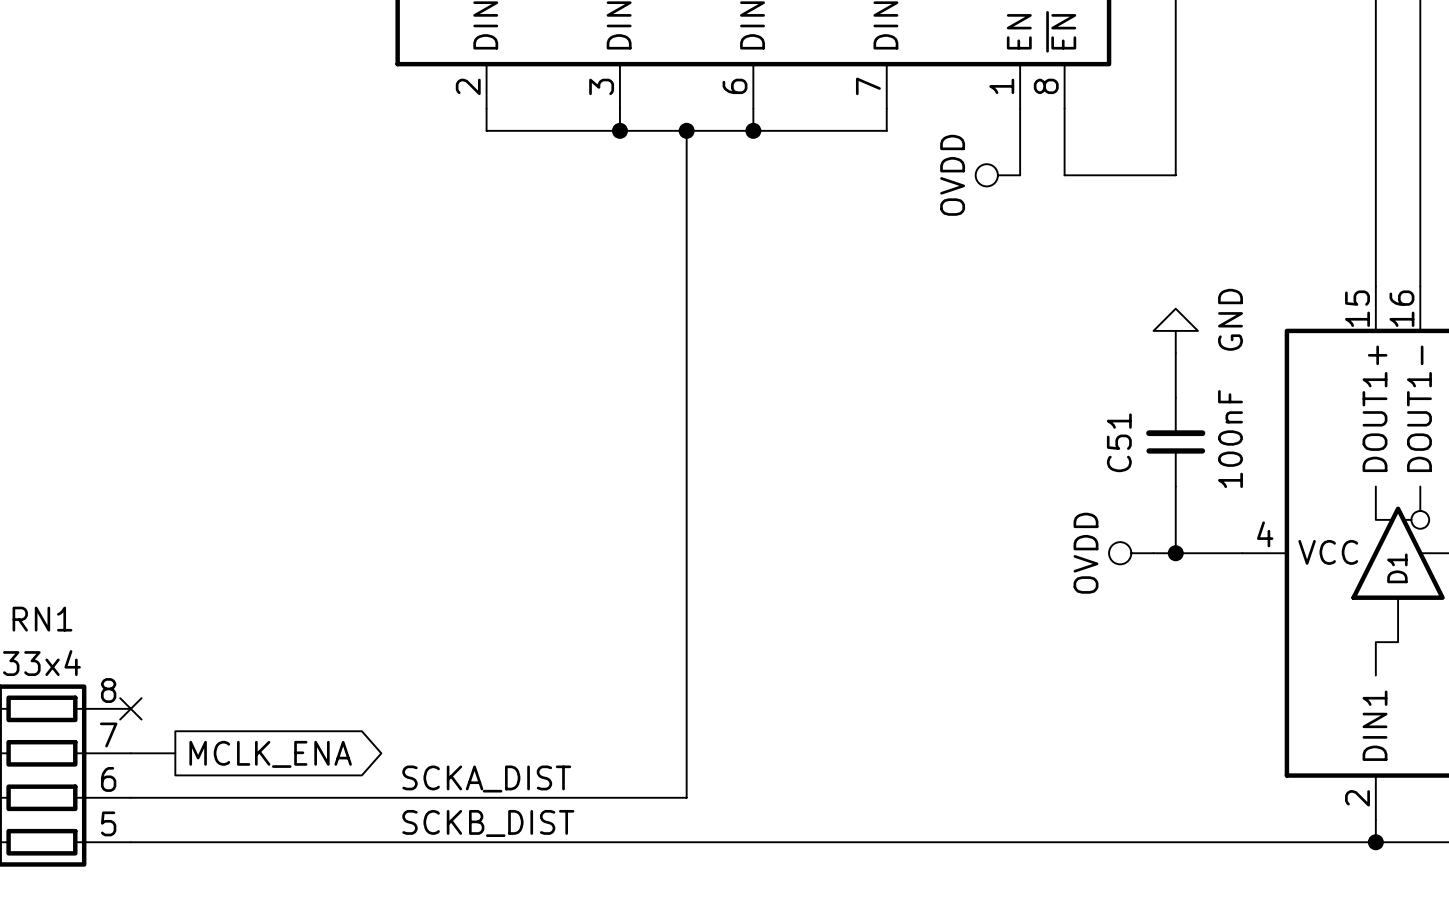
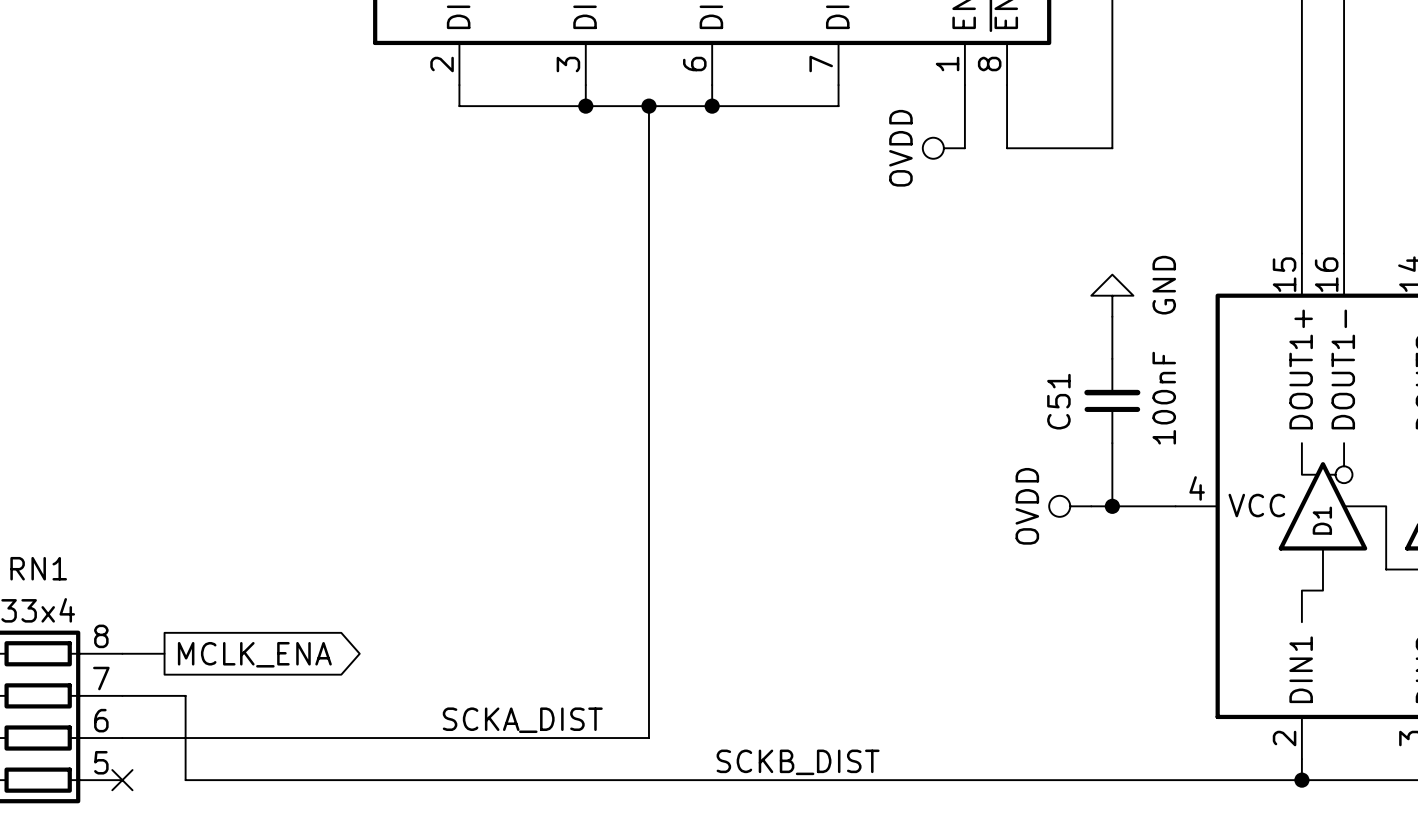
wire: none -> (122, 653) (164, 653)
no-connect mark: (130, 708) -> none
global label position: MCLK_ENA (270, 754) -> MCLK_ENA (254, 654)
label position: SCKA_DIST (486, 779) -> SCKA_DIST (522, 720)
label position: SCKB_DIST (488, 823) -> SCKB_DIST (798, 762)
wire: (130, 842) (197, 842) -> (164, 695) (185, 695) (185, 780)
no-connect mark: none -> (122, 780)

